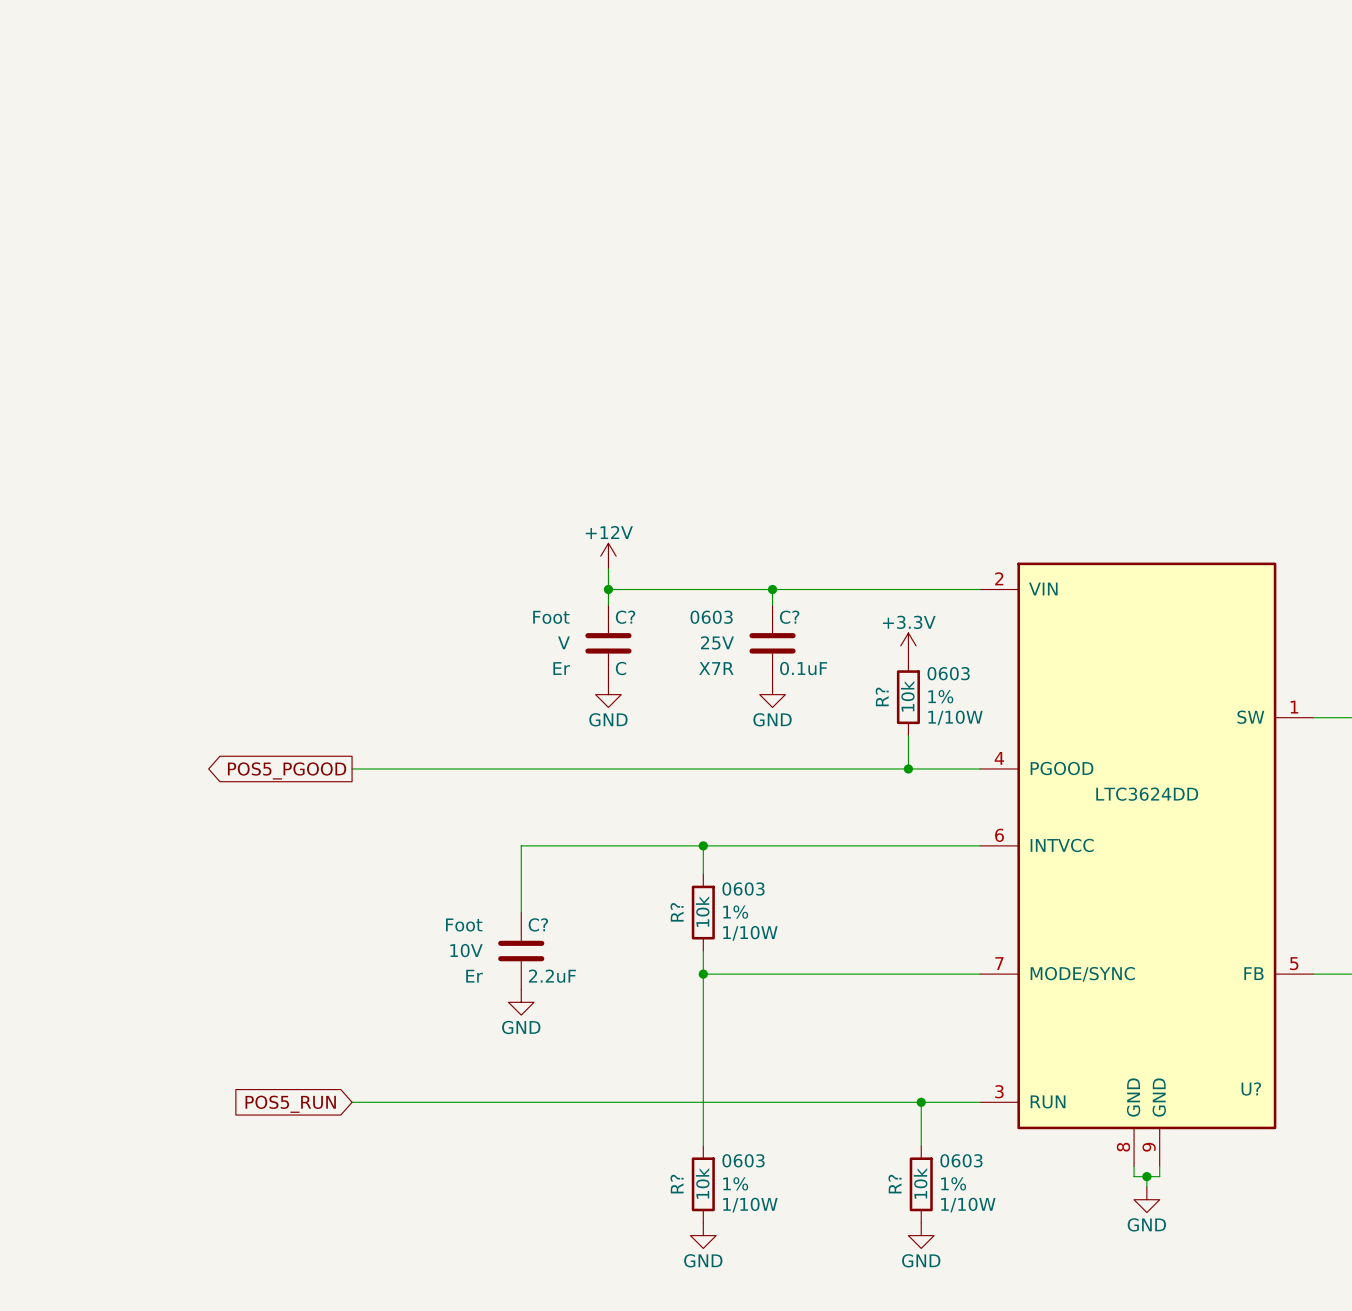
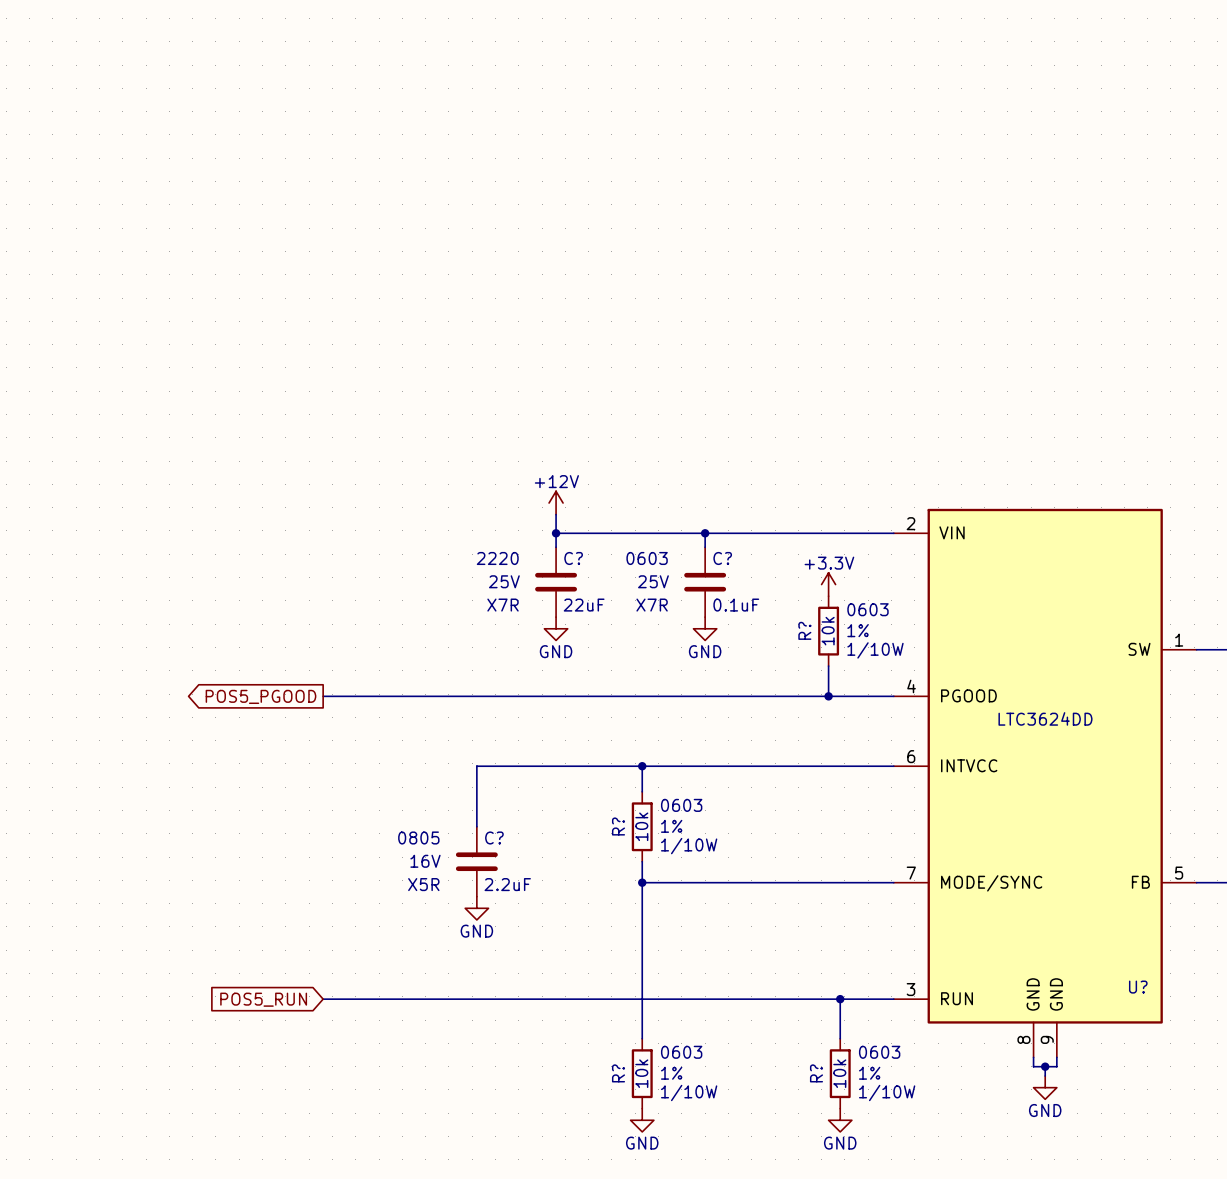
C? text: Foot (551, 617) -> 2220 (497, 558)
C? text: V (563, 642) -> 25V (504, 581)
C? text: Er (561, 668) -> X7R (503, 605)
C? value: C (621, 668) -> 22uF (584, 605)
C? text: Foot (464, 925) -> 0805 (418, 837)
C? text: 10V (466, 950) -> 16V (425, 861)
C? text: Er (474, 976) -> X5R (423, 884)

